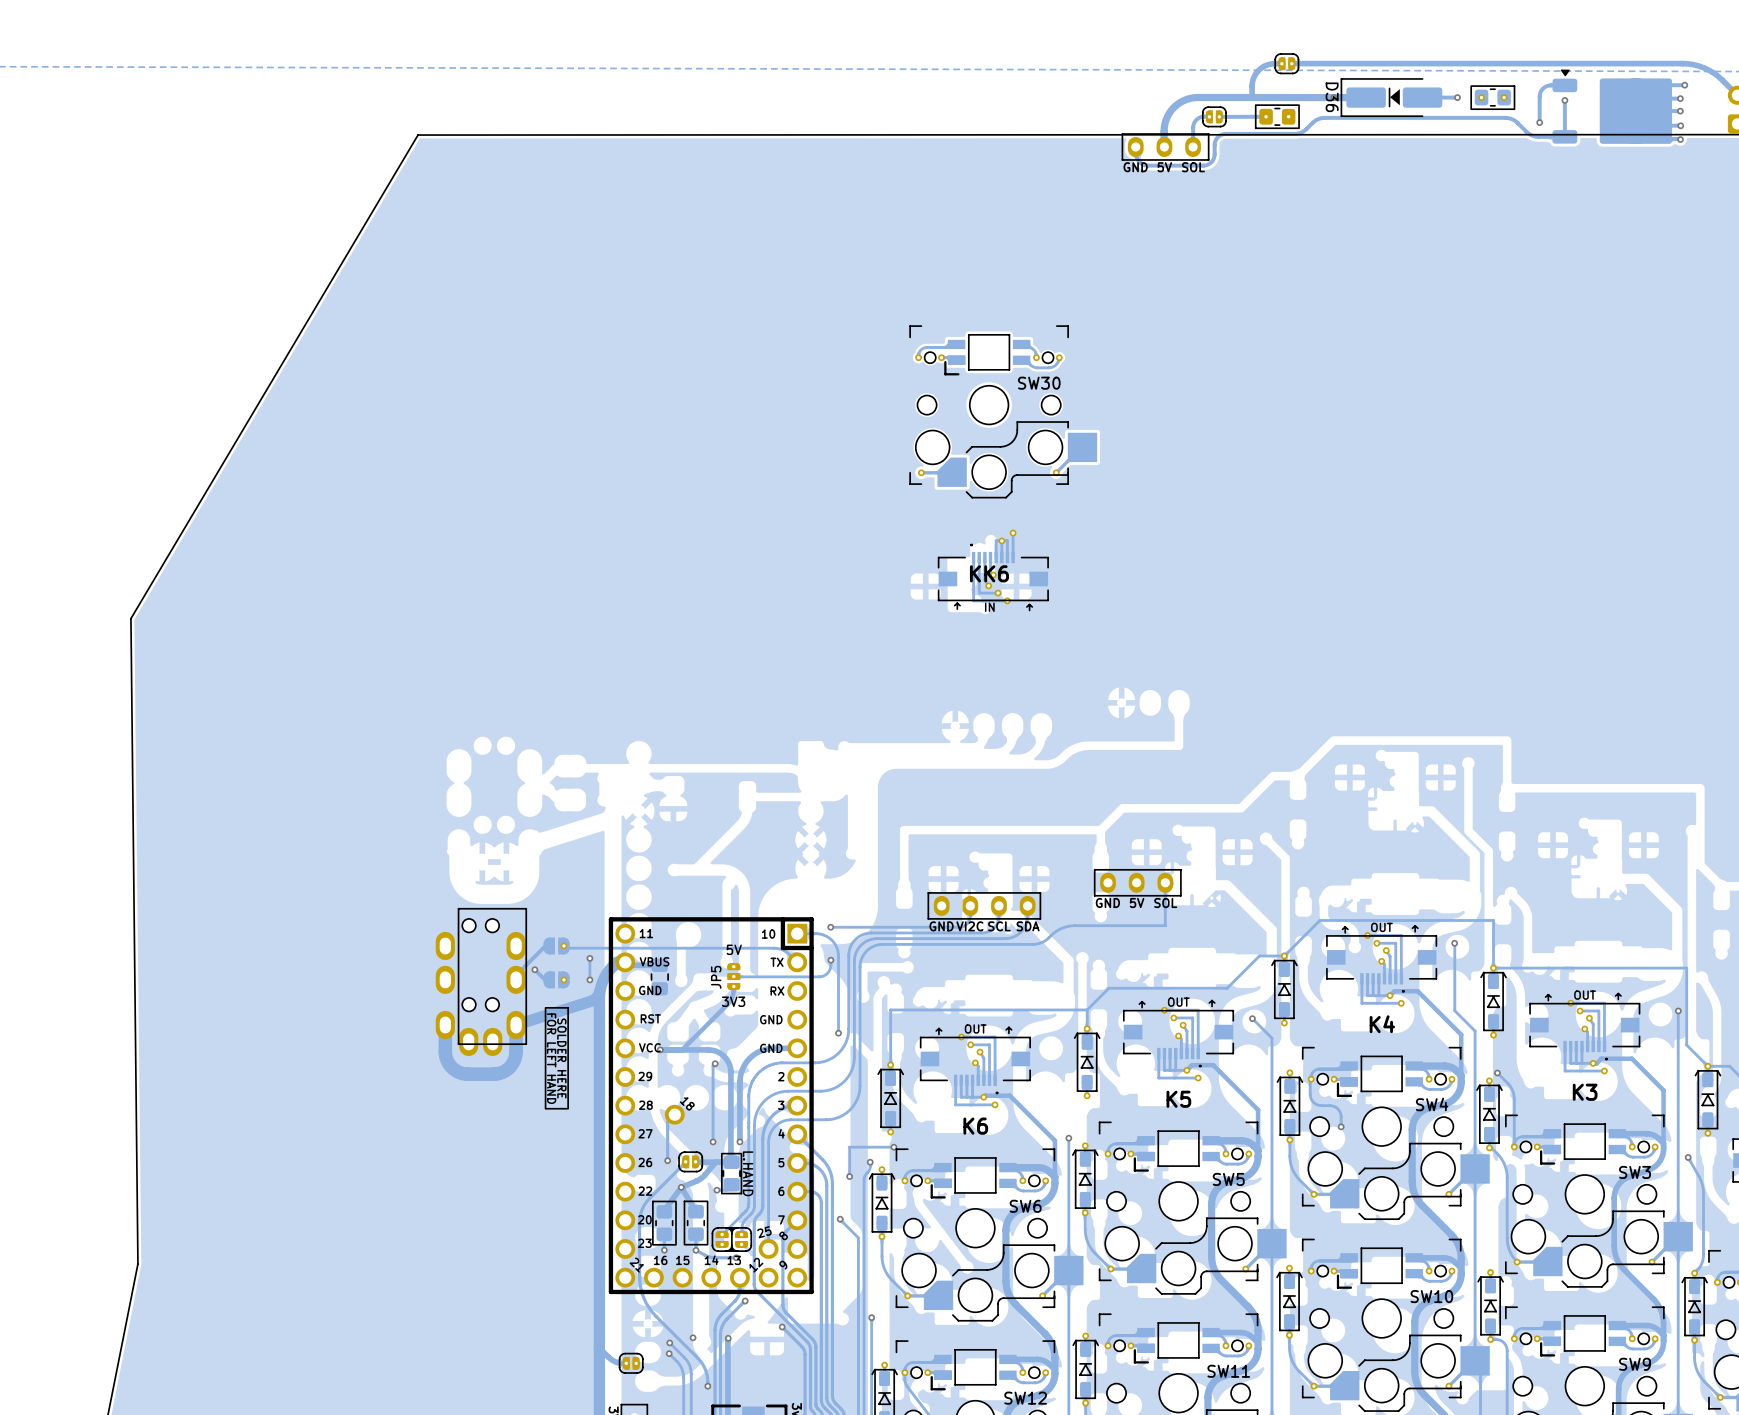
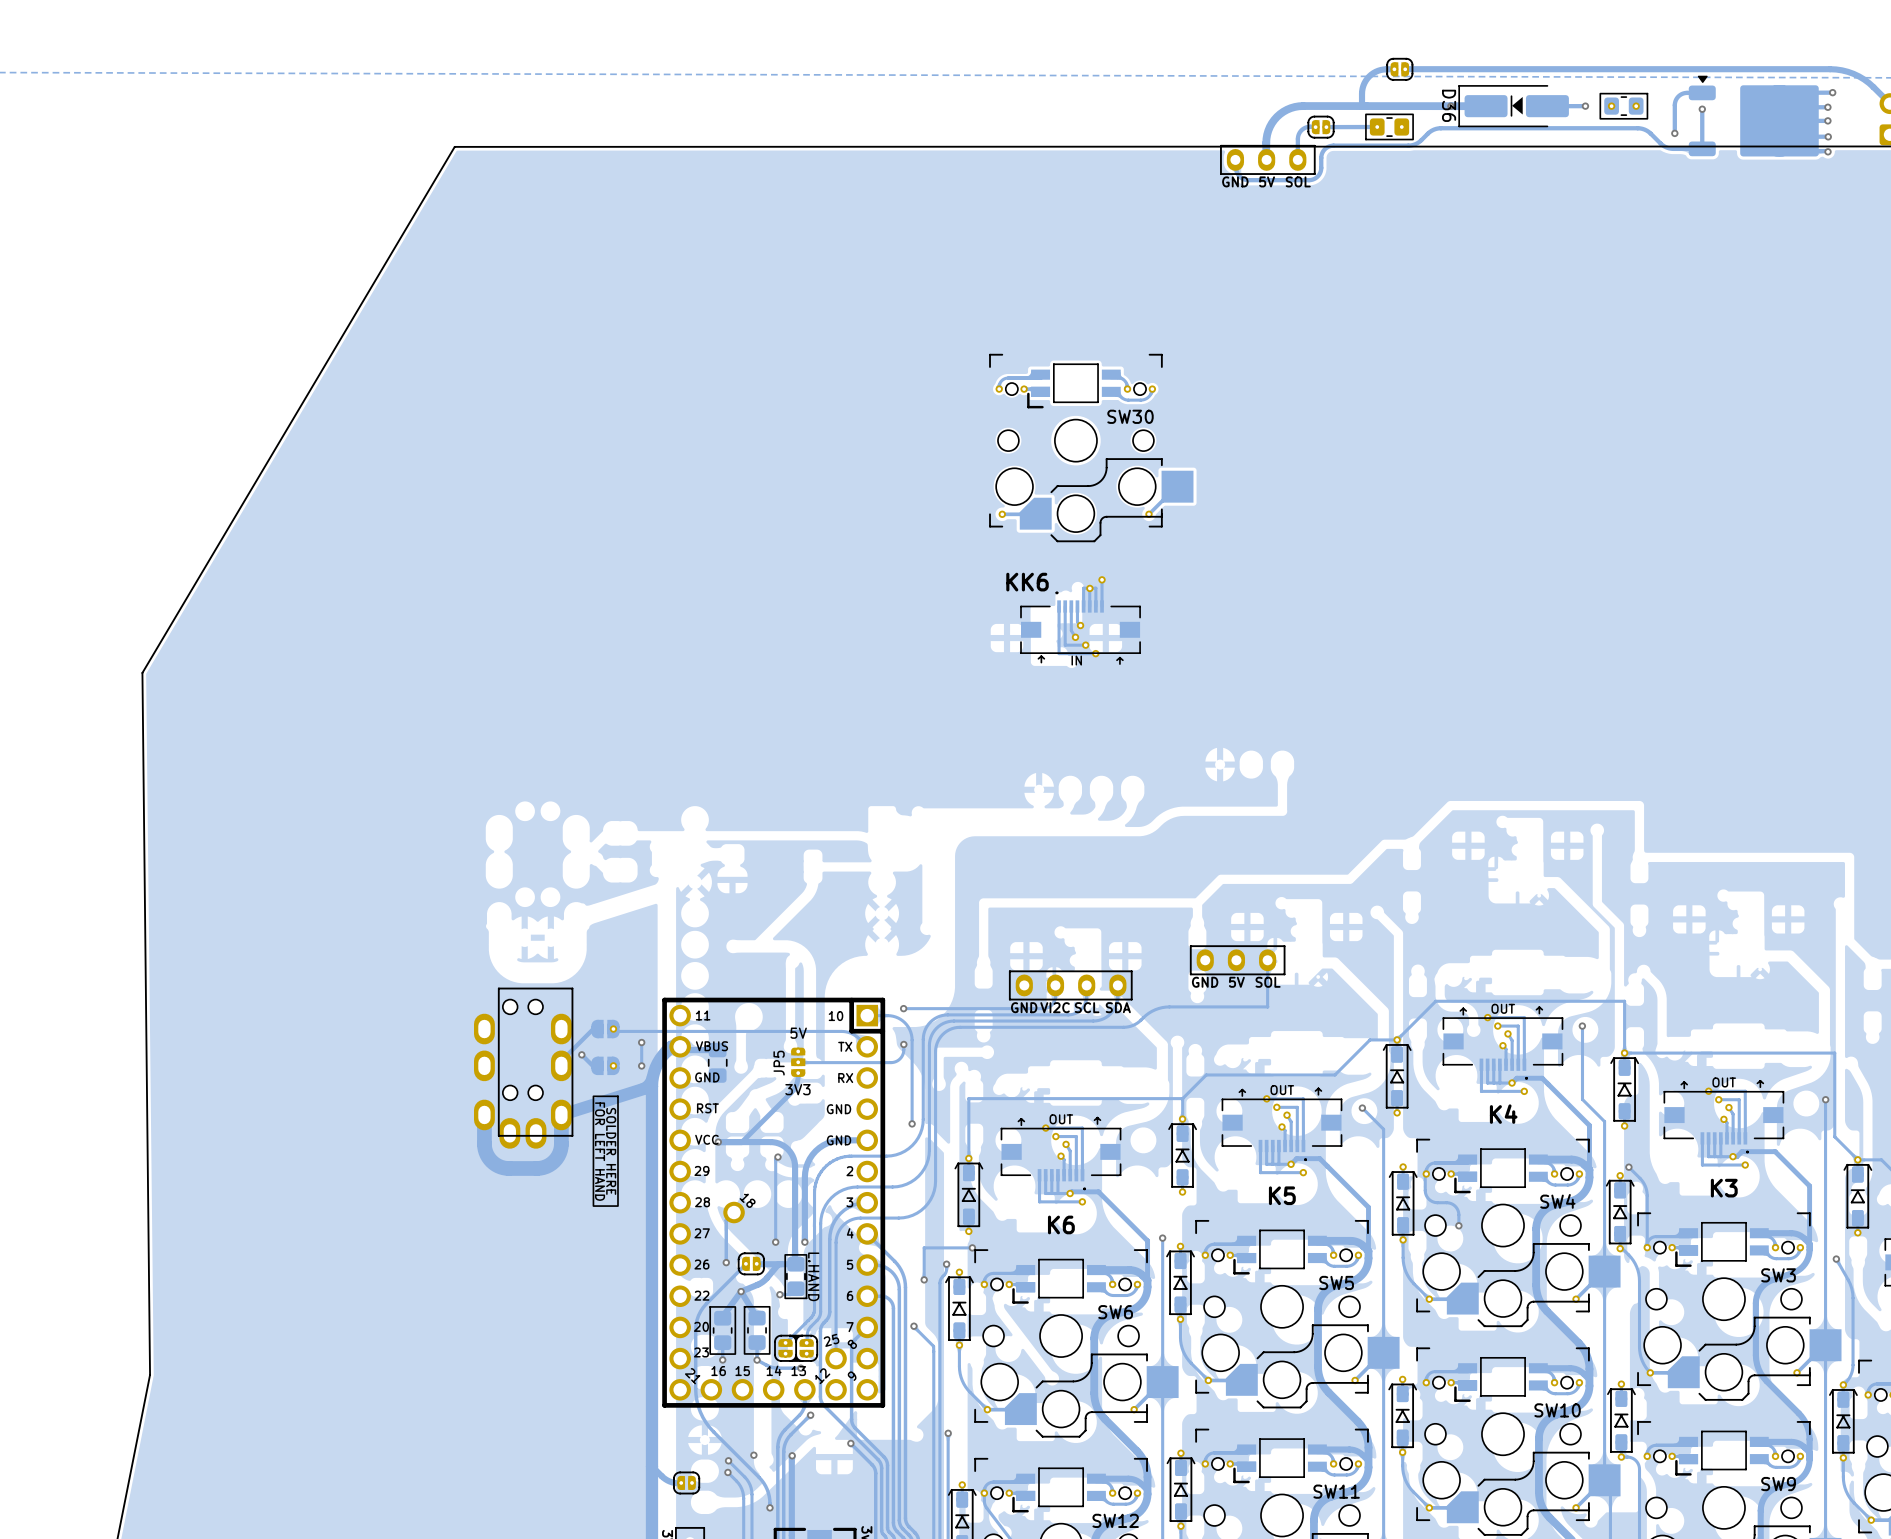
KK6 name position: KK6 (989, 573) -> KK6 (1027, 582)

